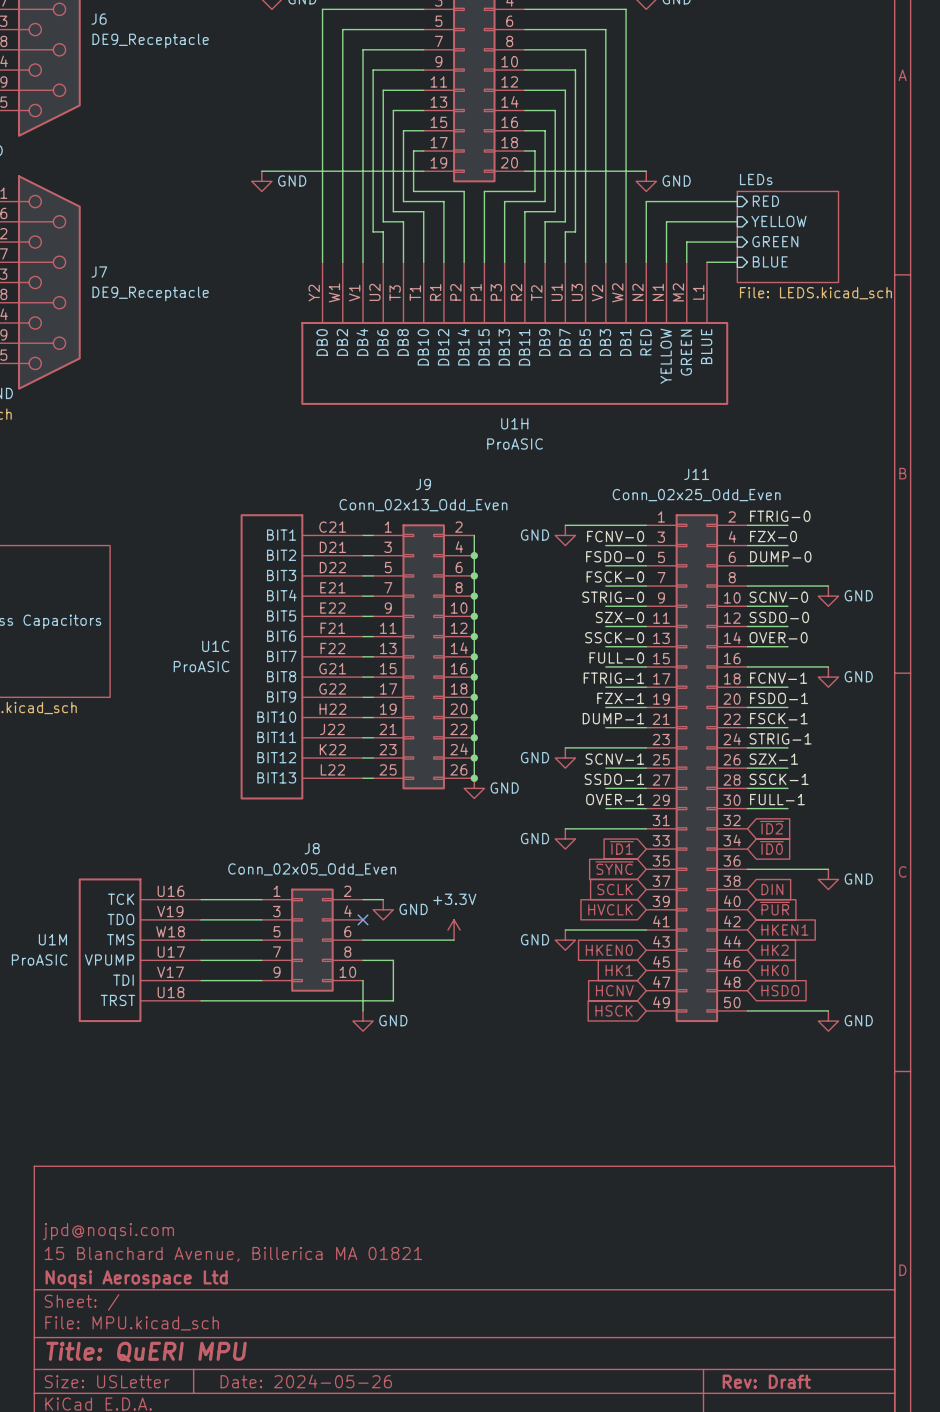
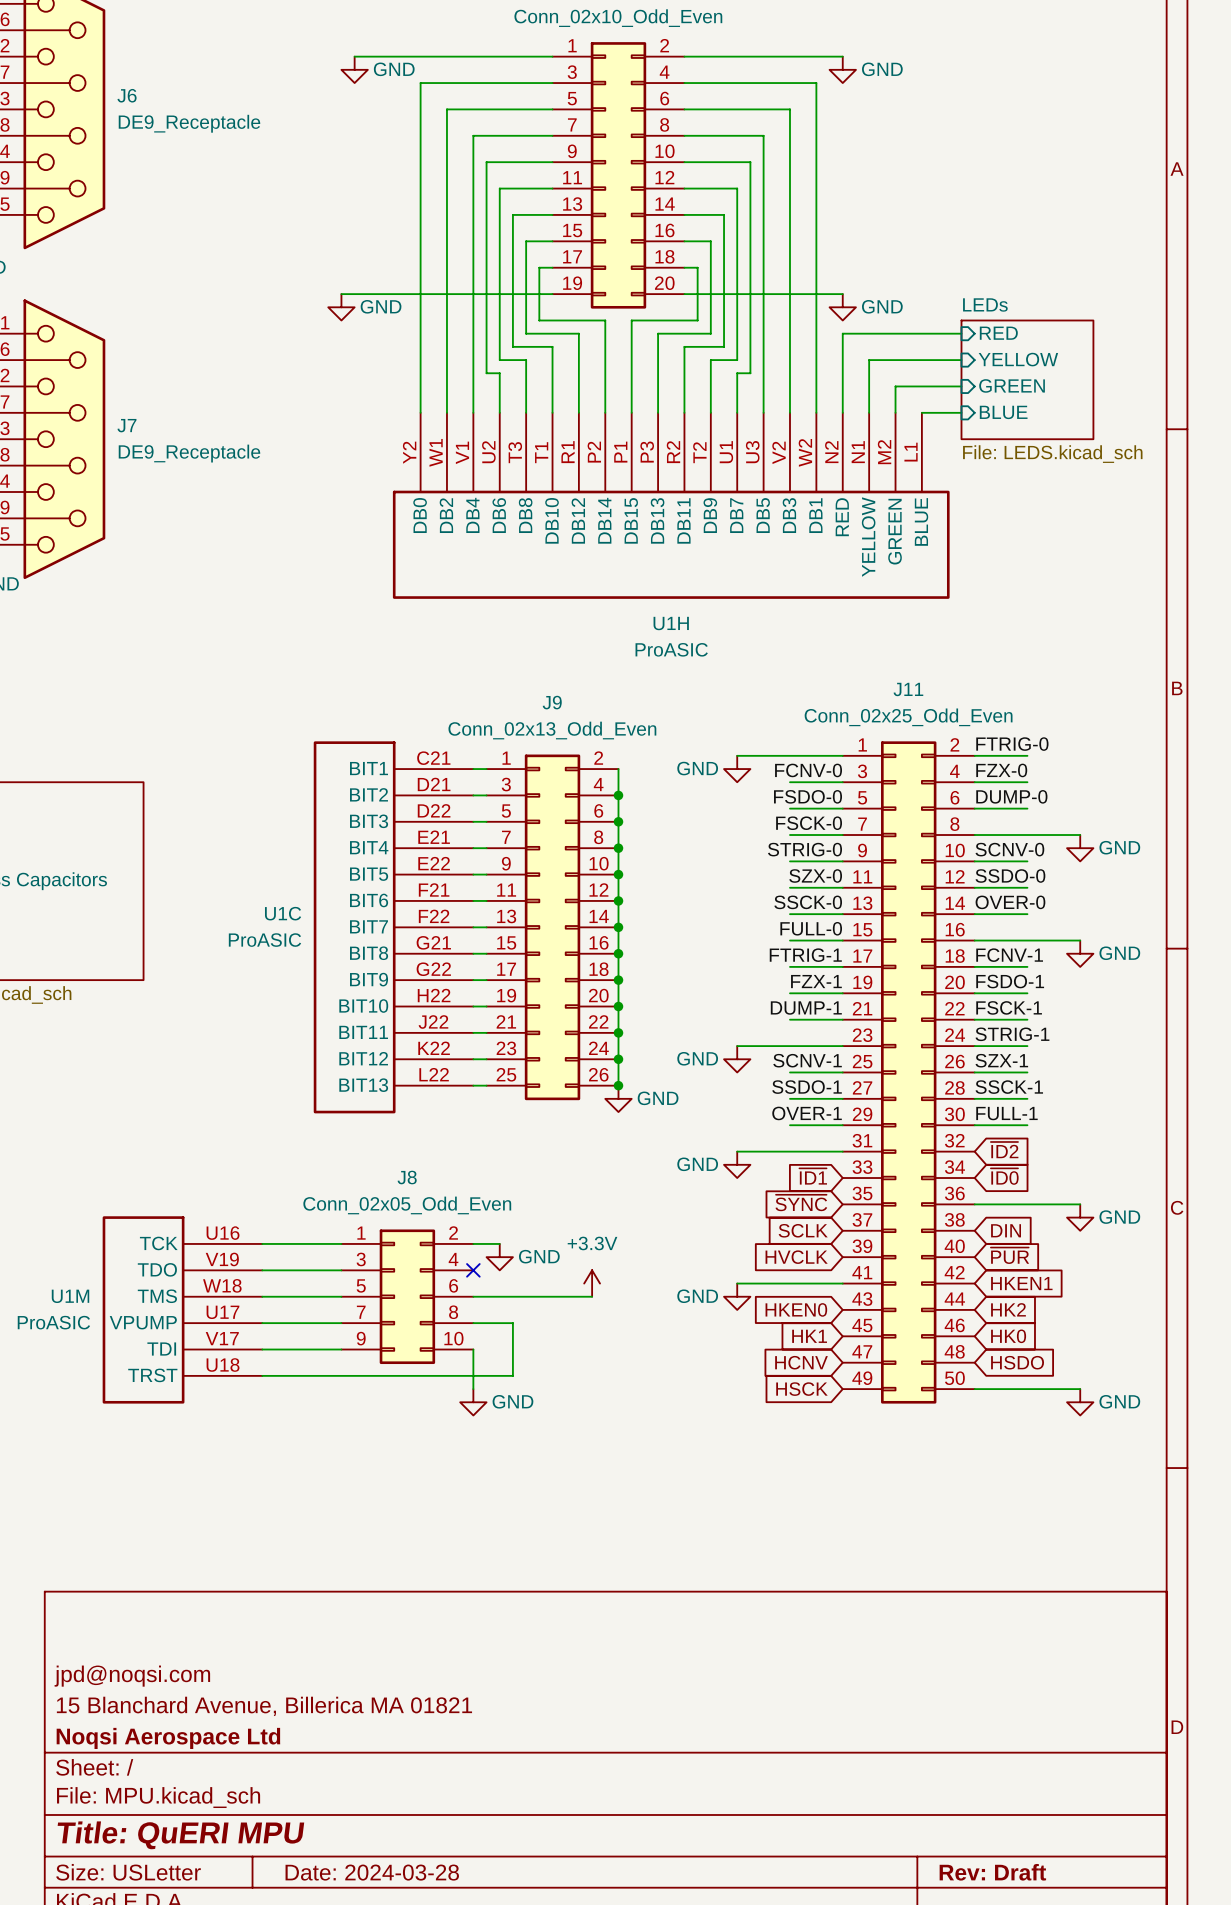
title block: Date: 2024-05-26 (306, 1381) -> Date: 2024-03-28 (372, 1872)

